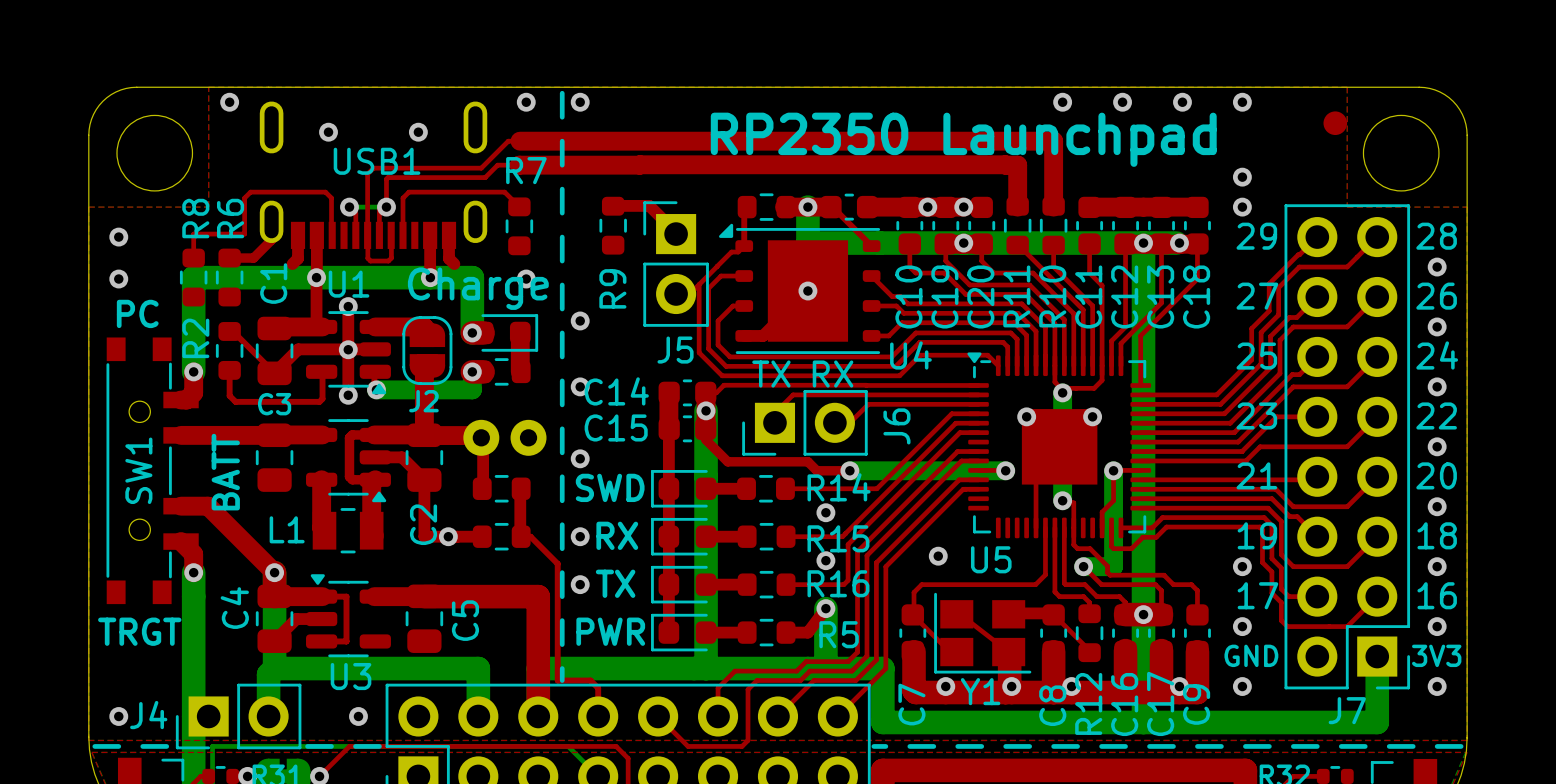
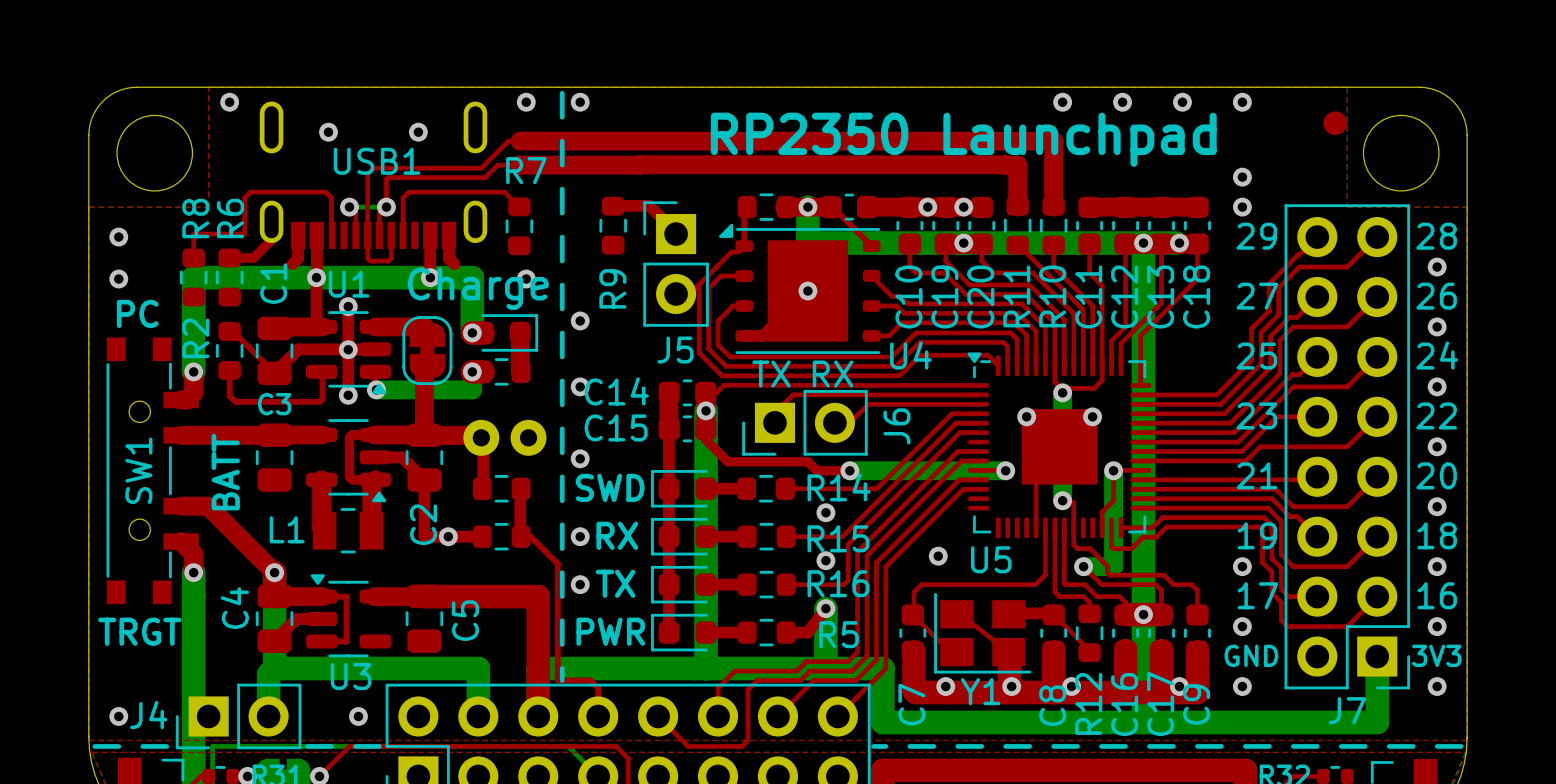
J2: (427, 350) -> none
part: none -> (427, 350)

